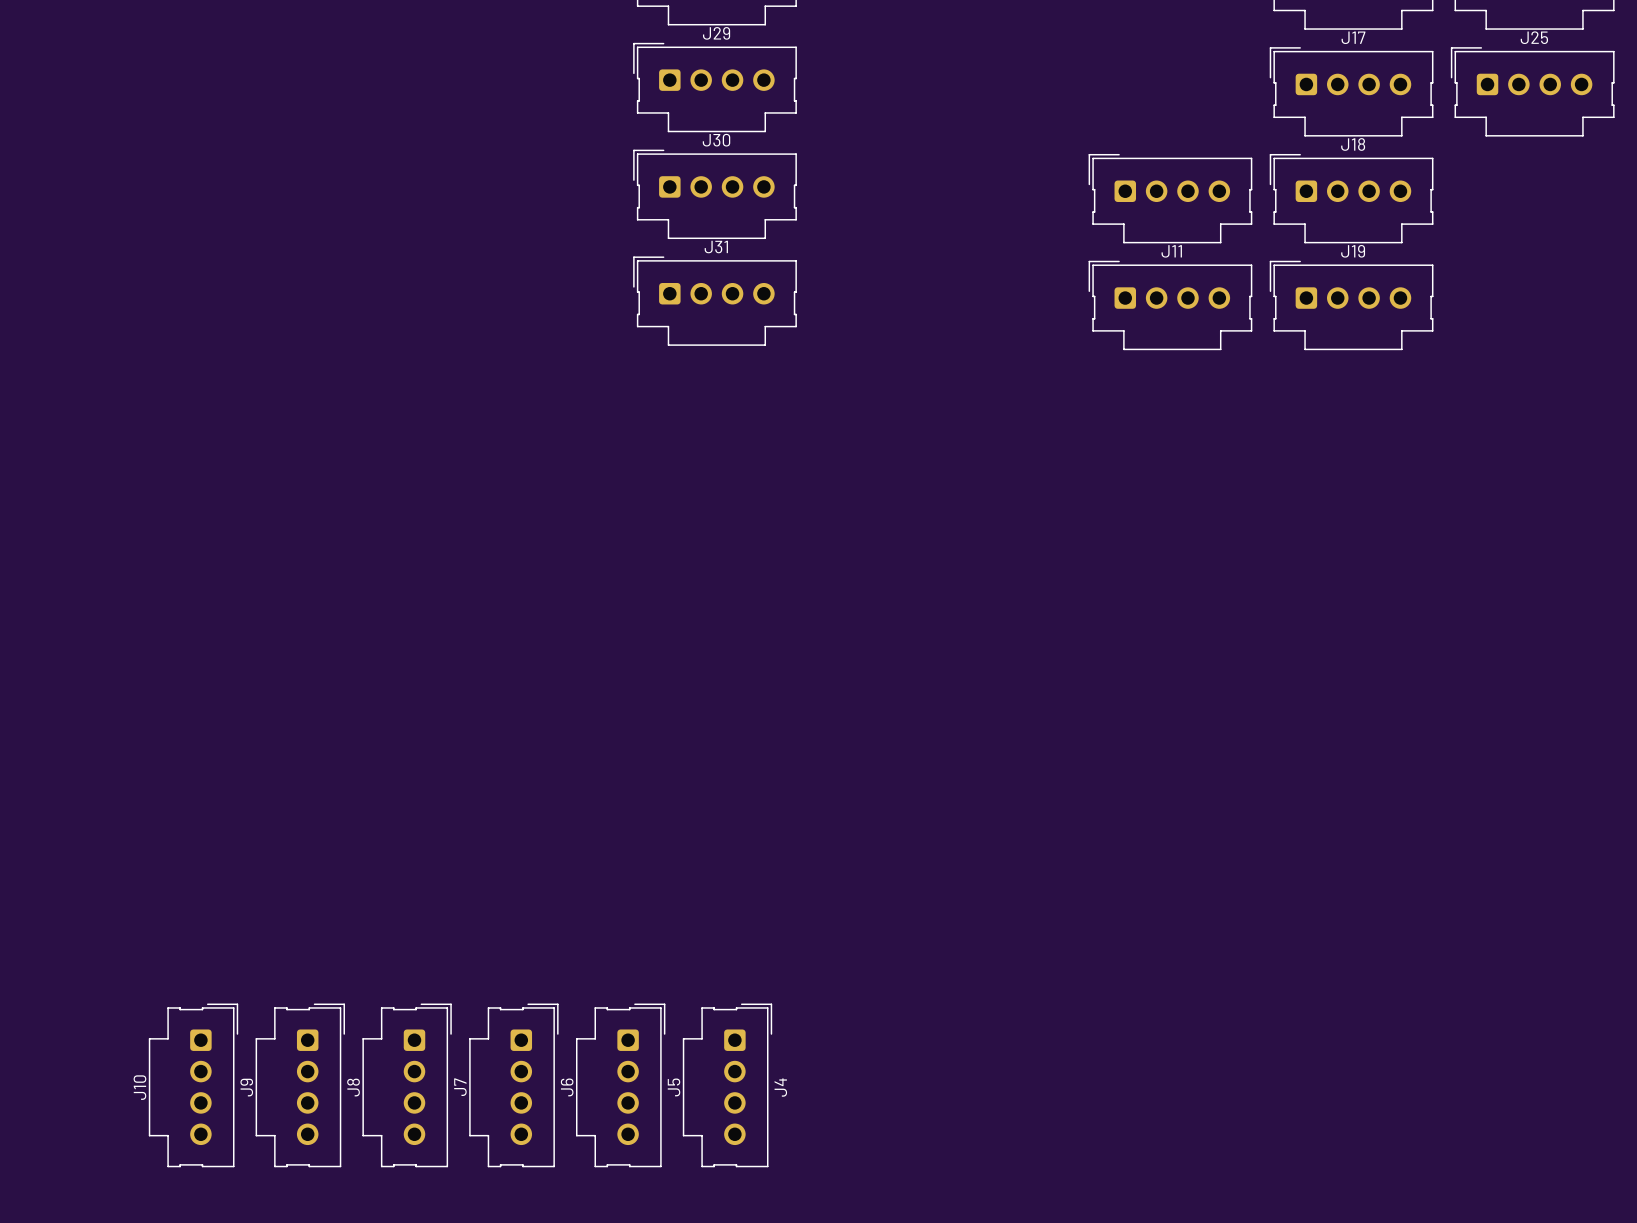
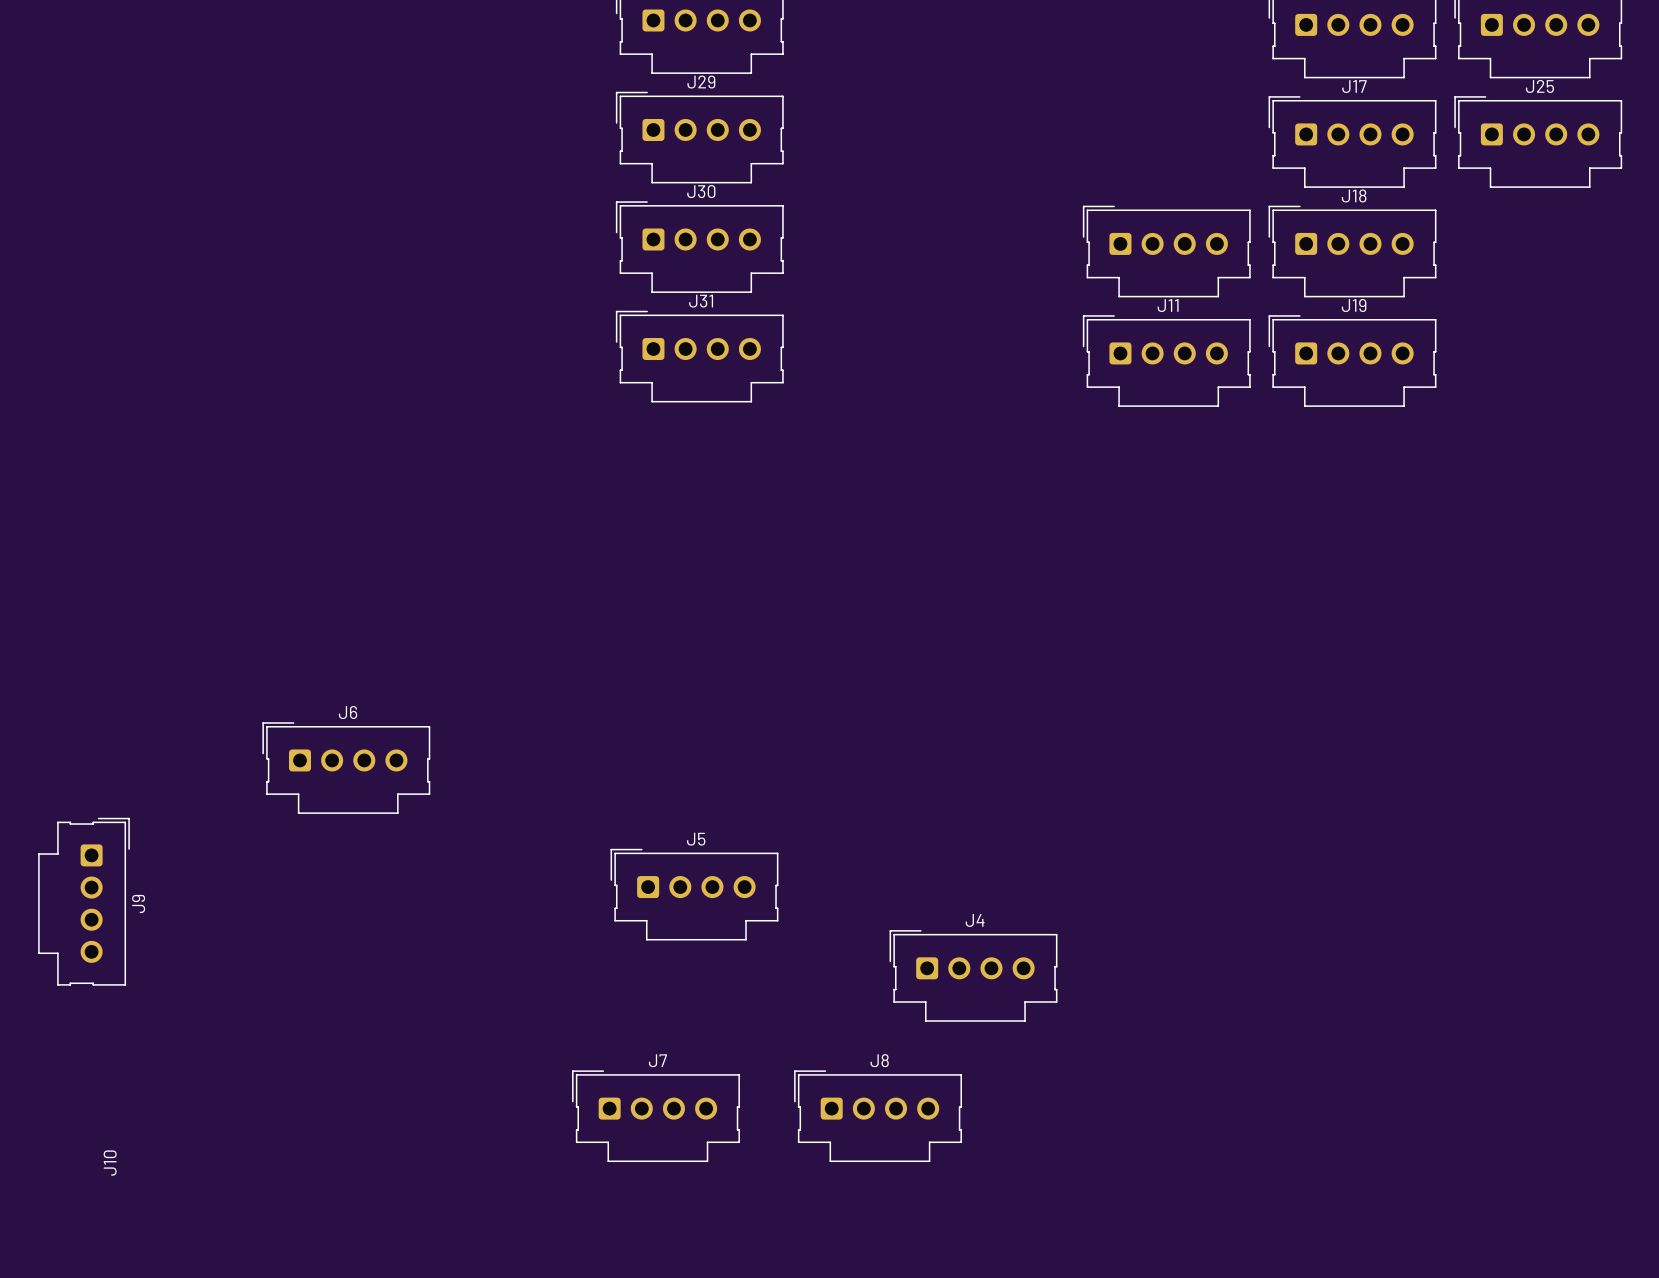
J9 position: (193, 1085) -> (84, 901)
J8 rotation: 0° (300, 1085) -> 90° counterclockwise (878, 1116)
J8 position: (300, 1085) -> (878, 1116)
J7 rotation: 0° (407, 1085) -> 90° counterclockwise (655, 1116)
J7 position: (407, 1085) -> (655, 1116)
J6 rotation: 0° (513, 1085) -> 90° counterclockwise (346, 768)
J6 position: (513, 1085) -> (346, 768)
J5 rotation: 0° (620, 1085) -> 90° counterclockwise (694, 894)
J5 position: (620, 1085) -> (694, 894)
J4 rotation: 0° (727, 1085) -> 90° counterclockwise (973, 975)
J4 position: (727, 1085) -> (973, 975)

